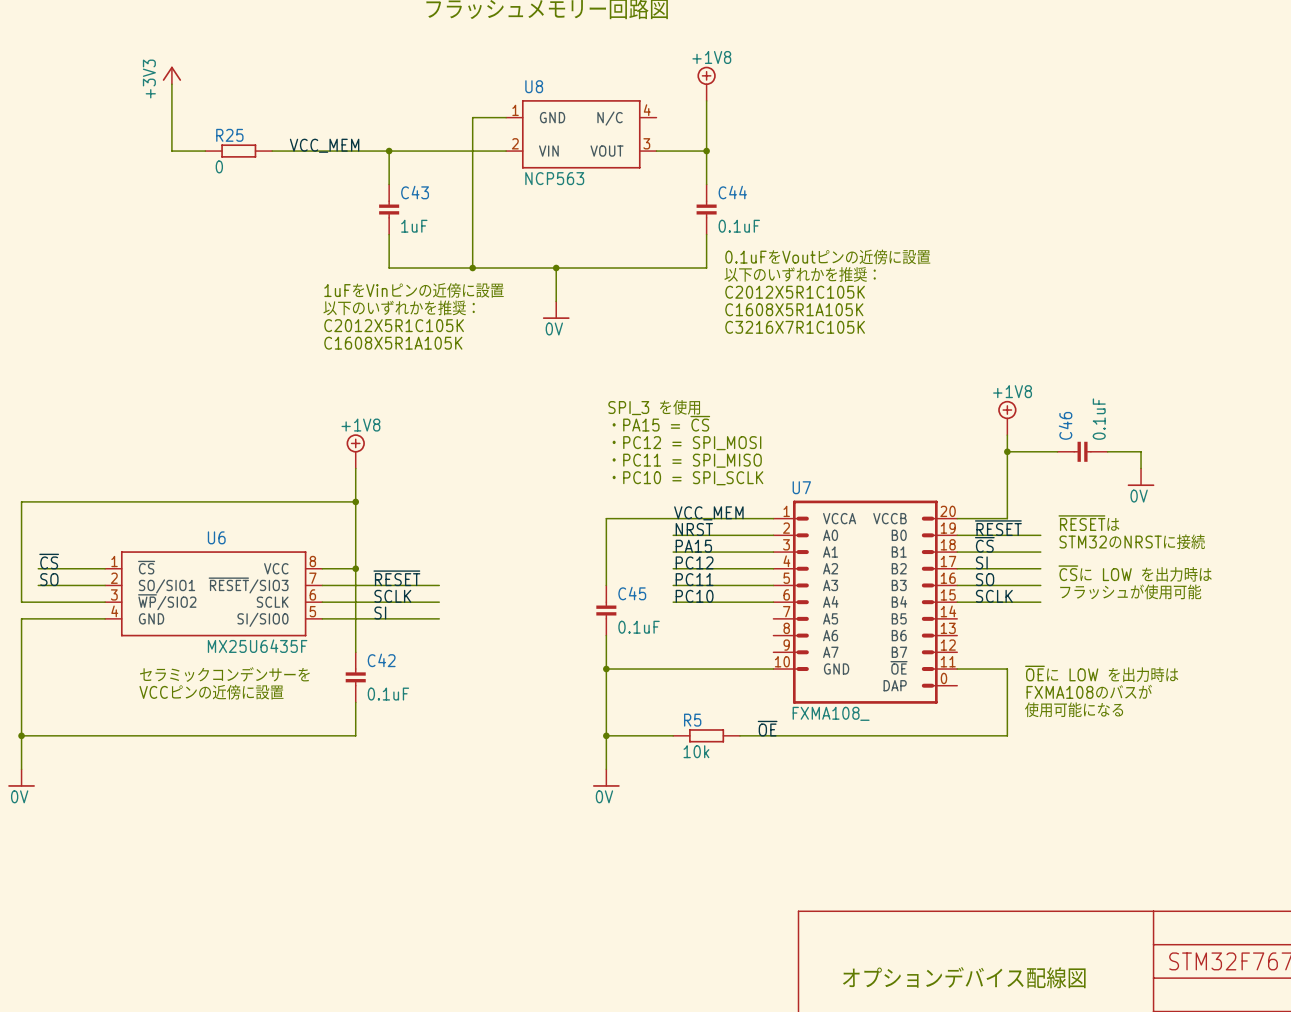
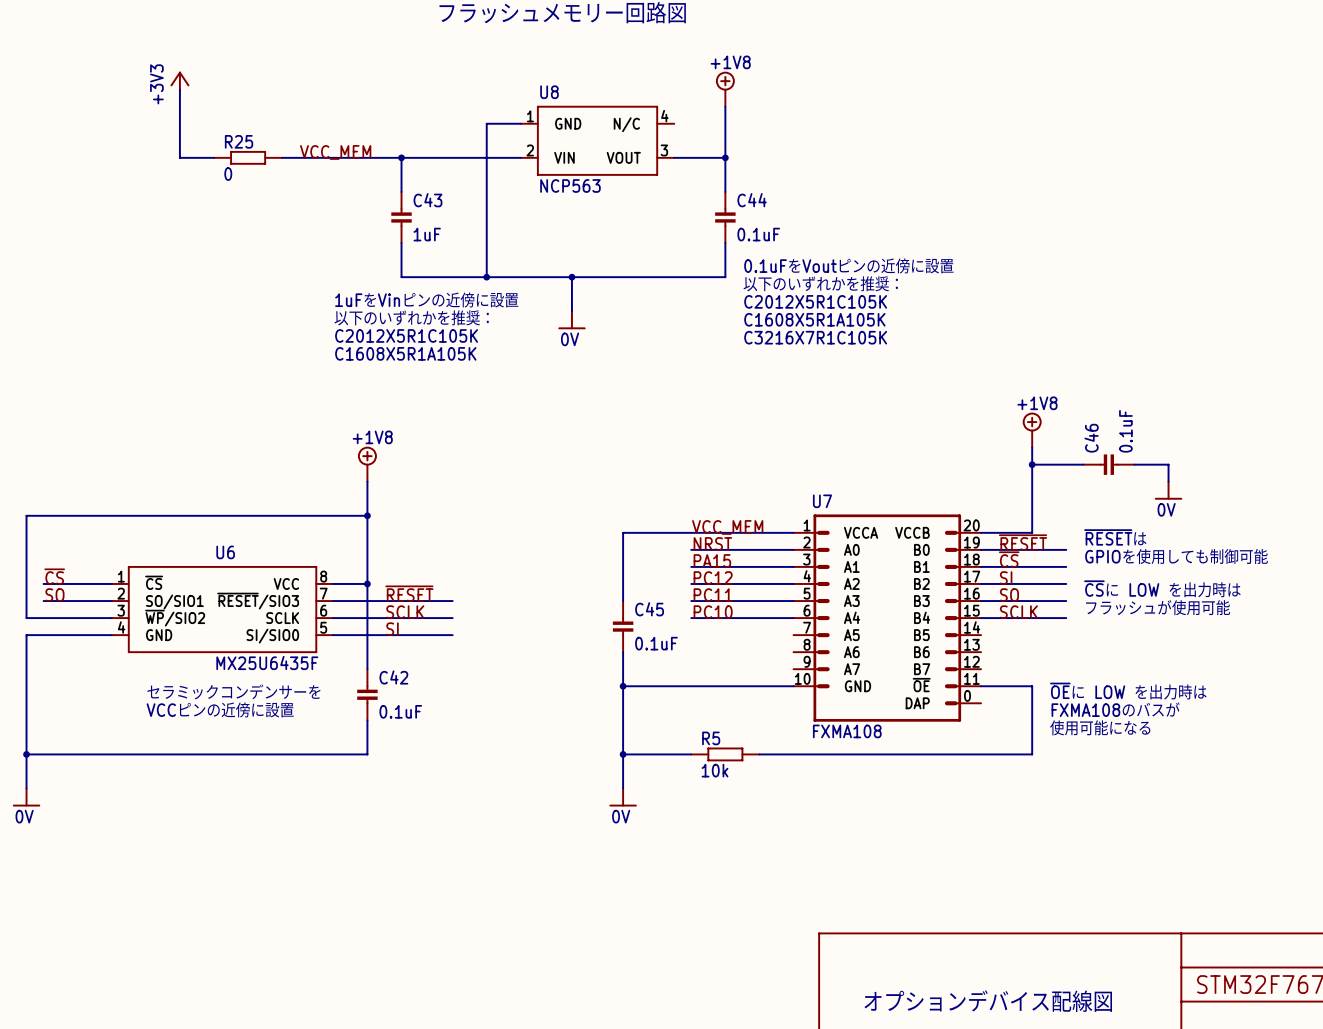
text: SPI_3 を使用 (654, 407) -> none
text: ・PA15 = ~{CS} (661, 423) -> none
text: ・PC12 = SPI_MOSI (686, 443) -> none
text: ・PC11 = SPI_MISO (686, 460) -> none
text: ・PC10 = SPI_SCLK (687, 478) -> none
text: STM32のNRSTに接続 (1132, 541) -> GPIOを使用しても制御可能 (1176, 556)
U7 value: FXMA108_ (831, 713) -> FXMA108 (847, 731)
label: ~{OE} (767, 728) -> none

